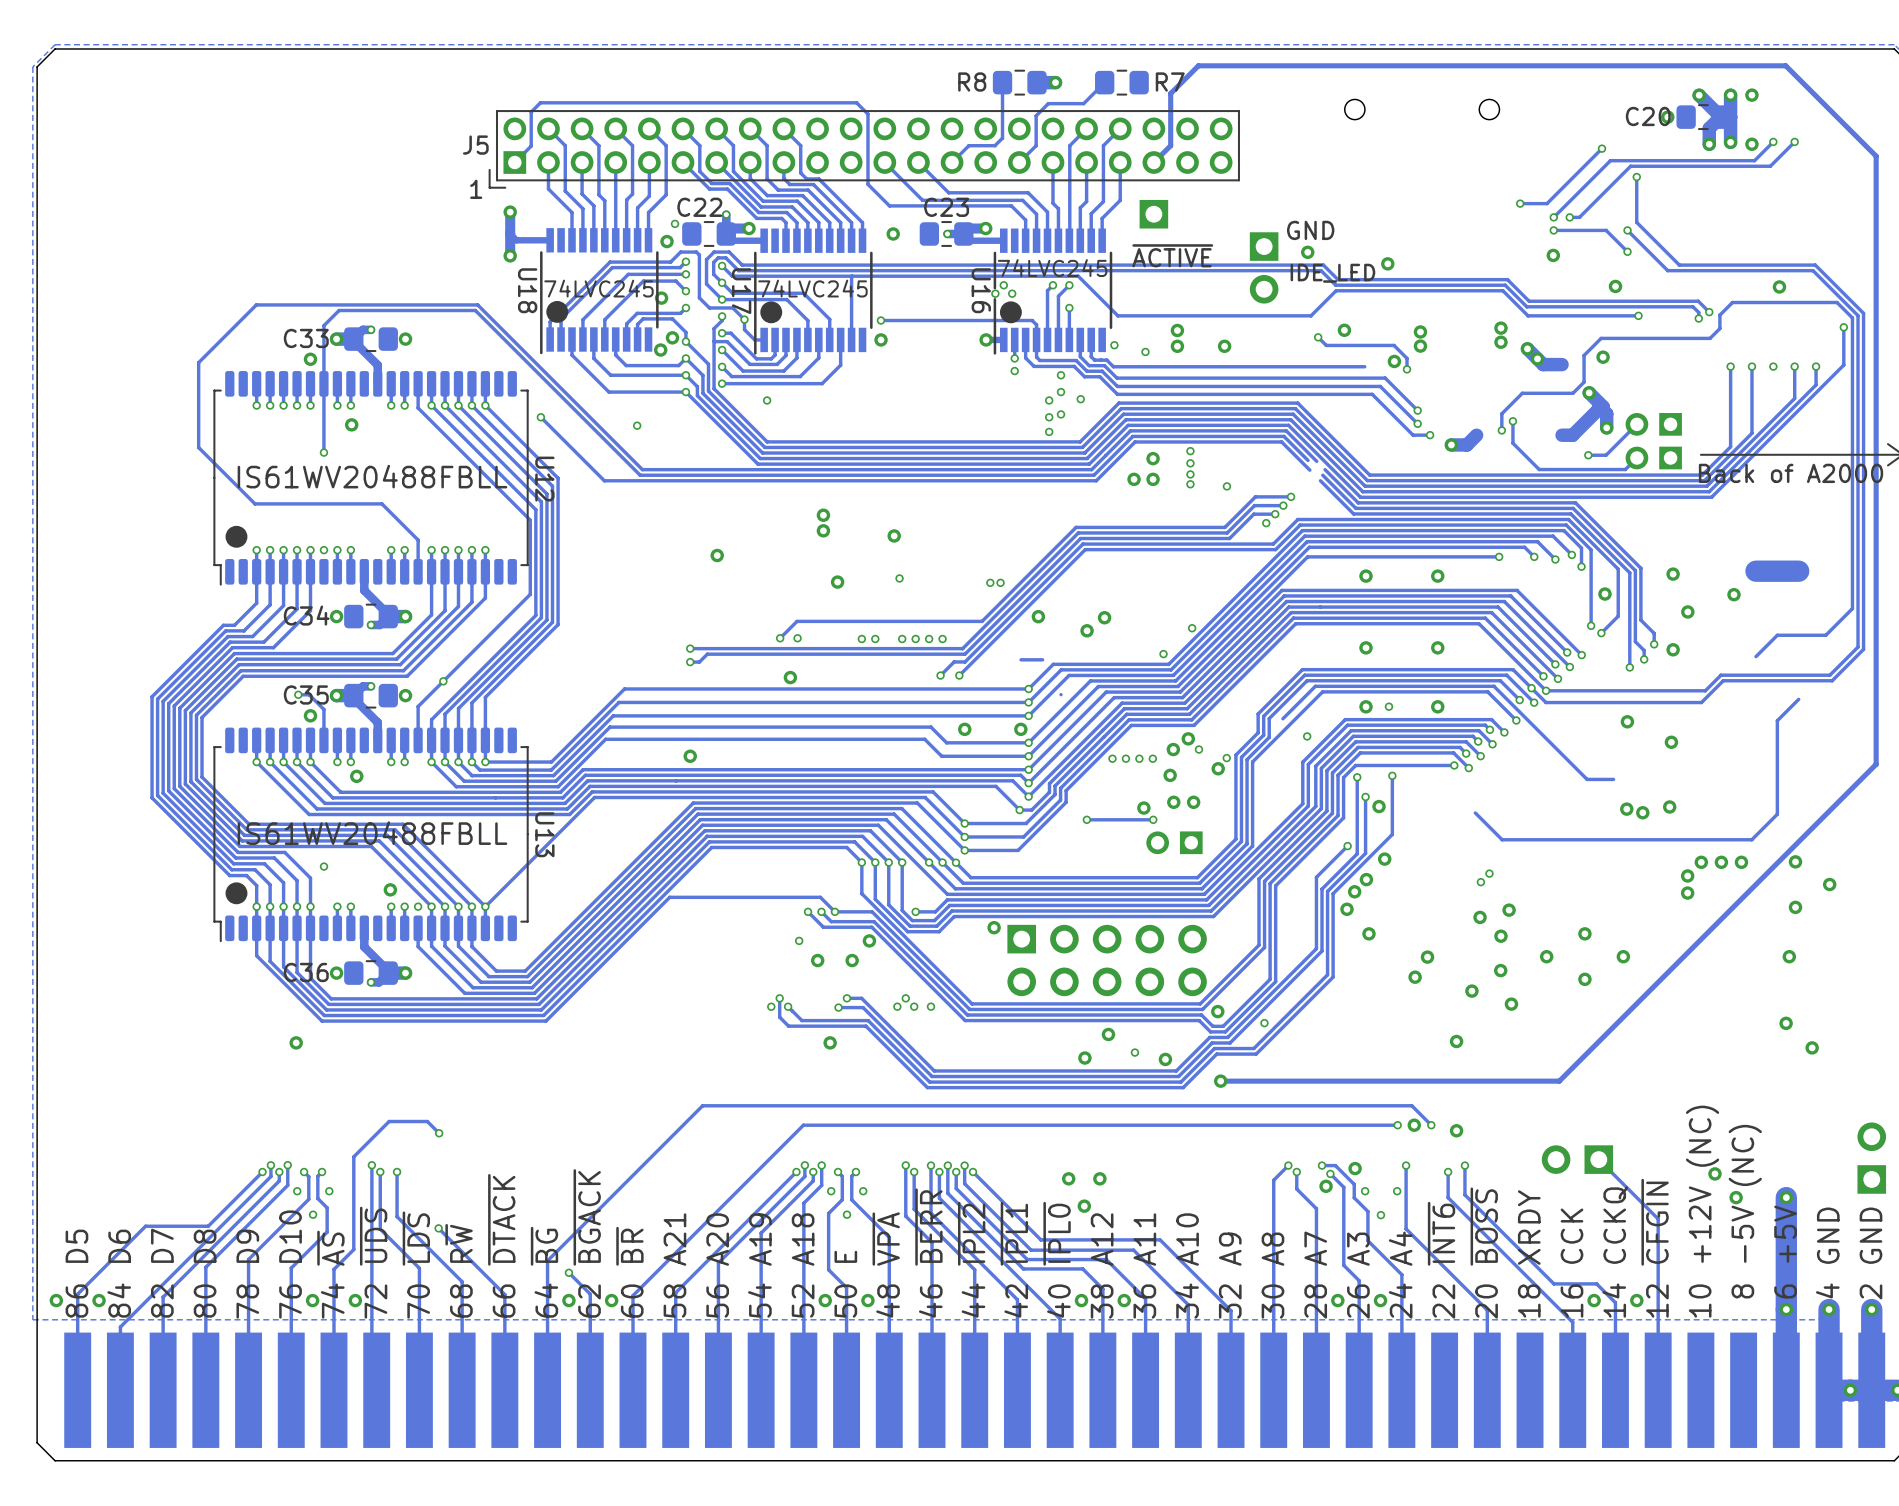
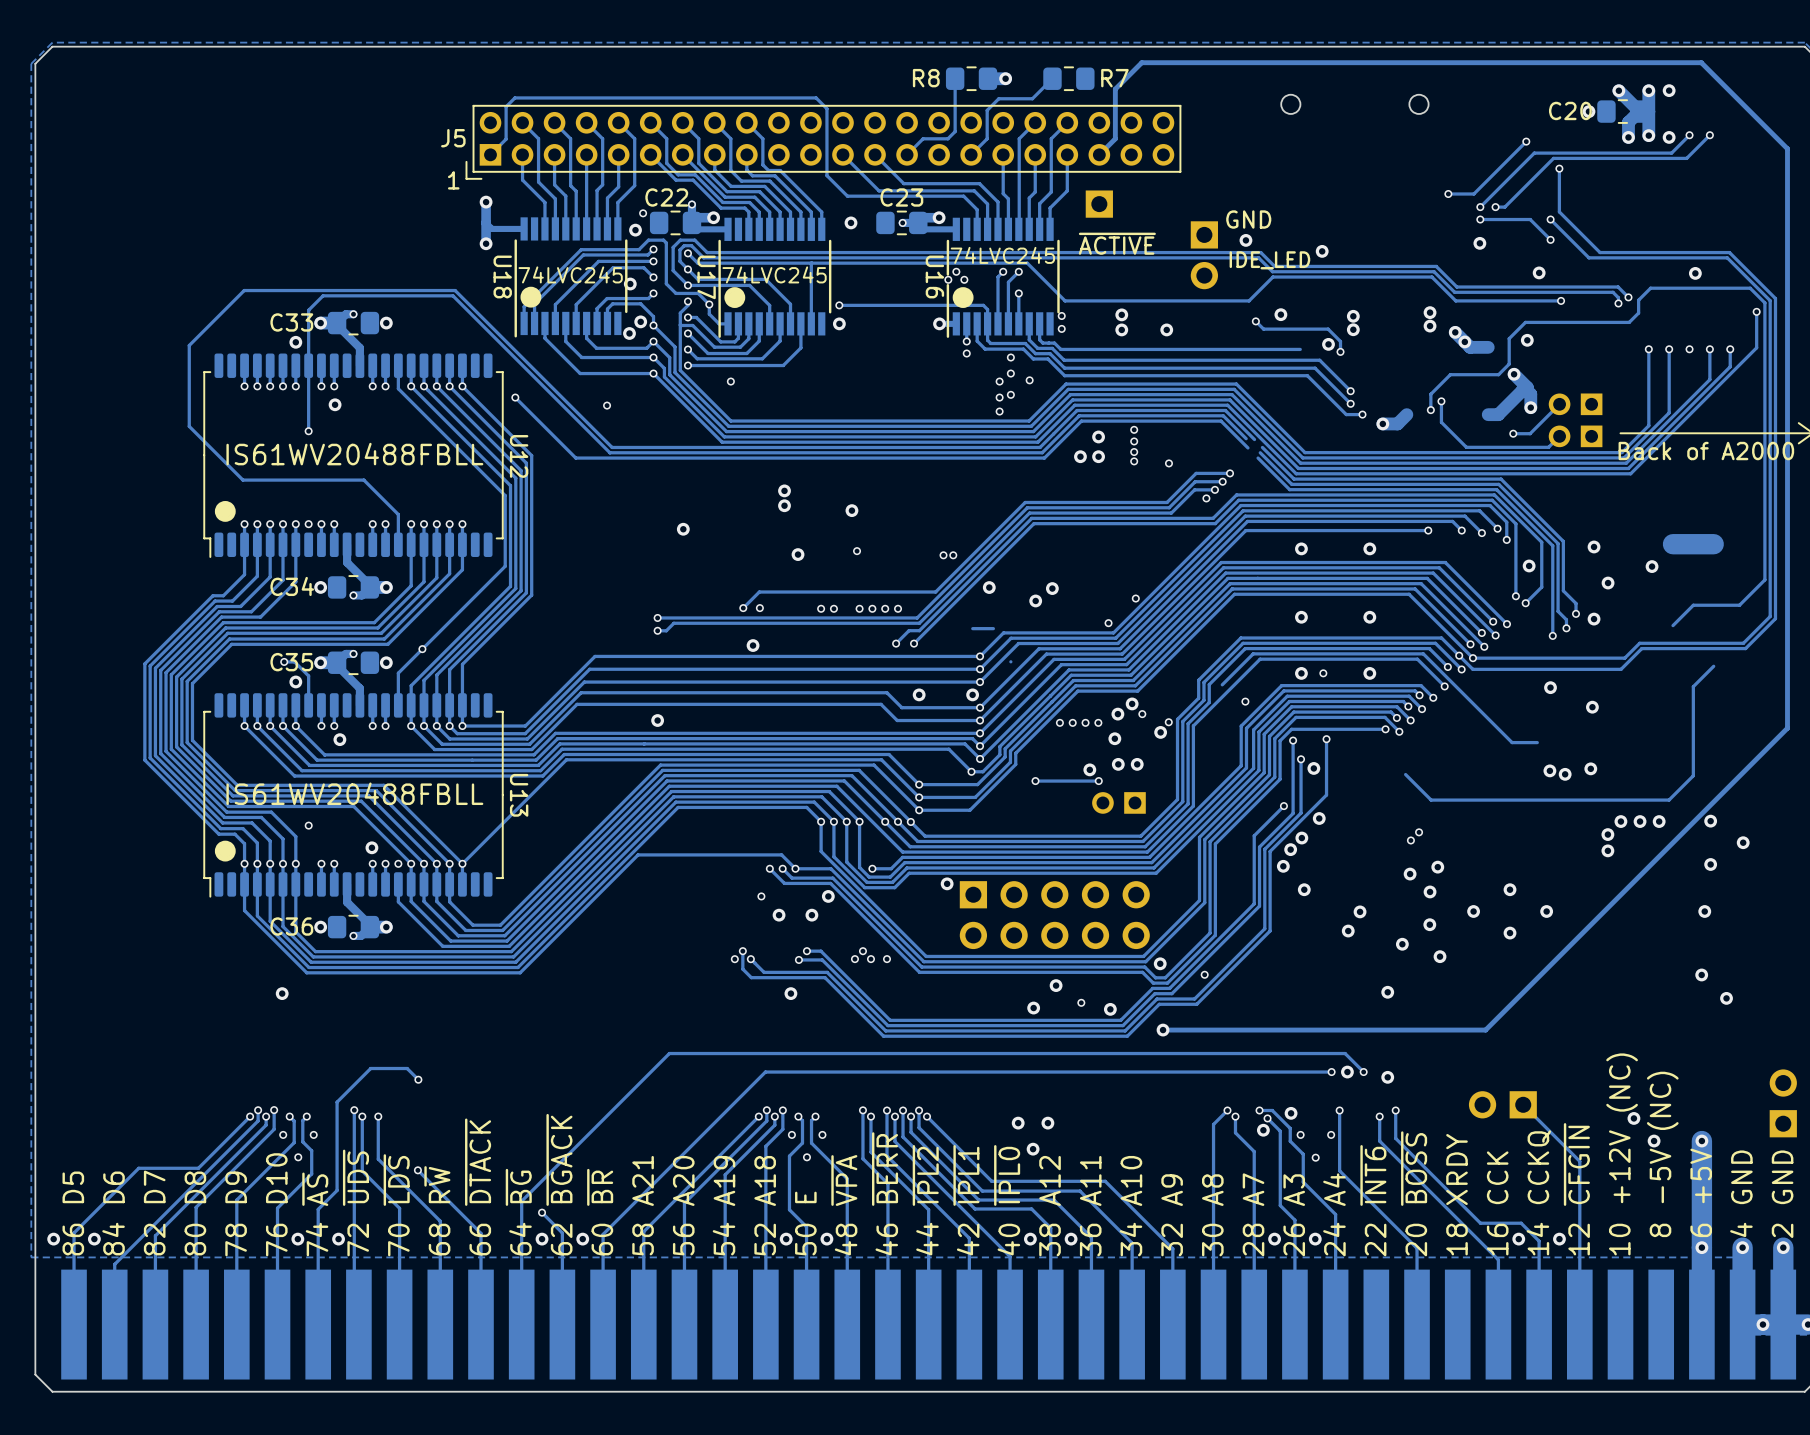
via position: (1145, 351) -> (1061, 315)

